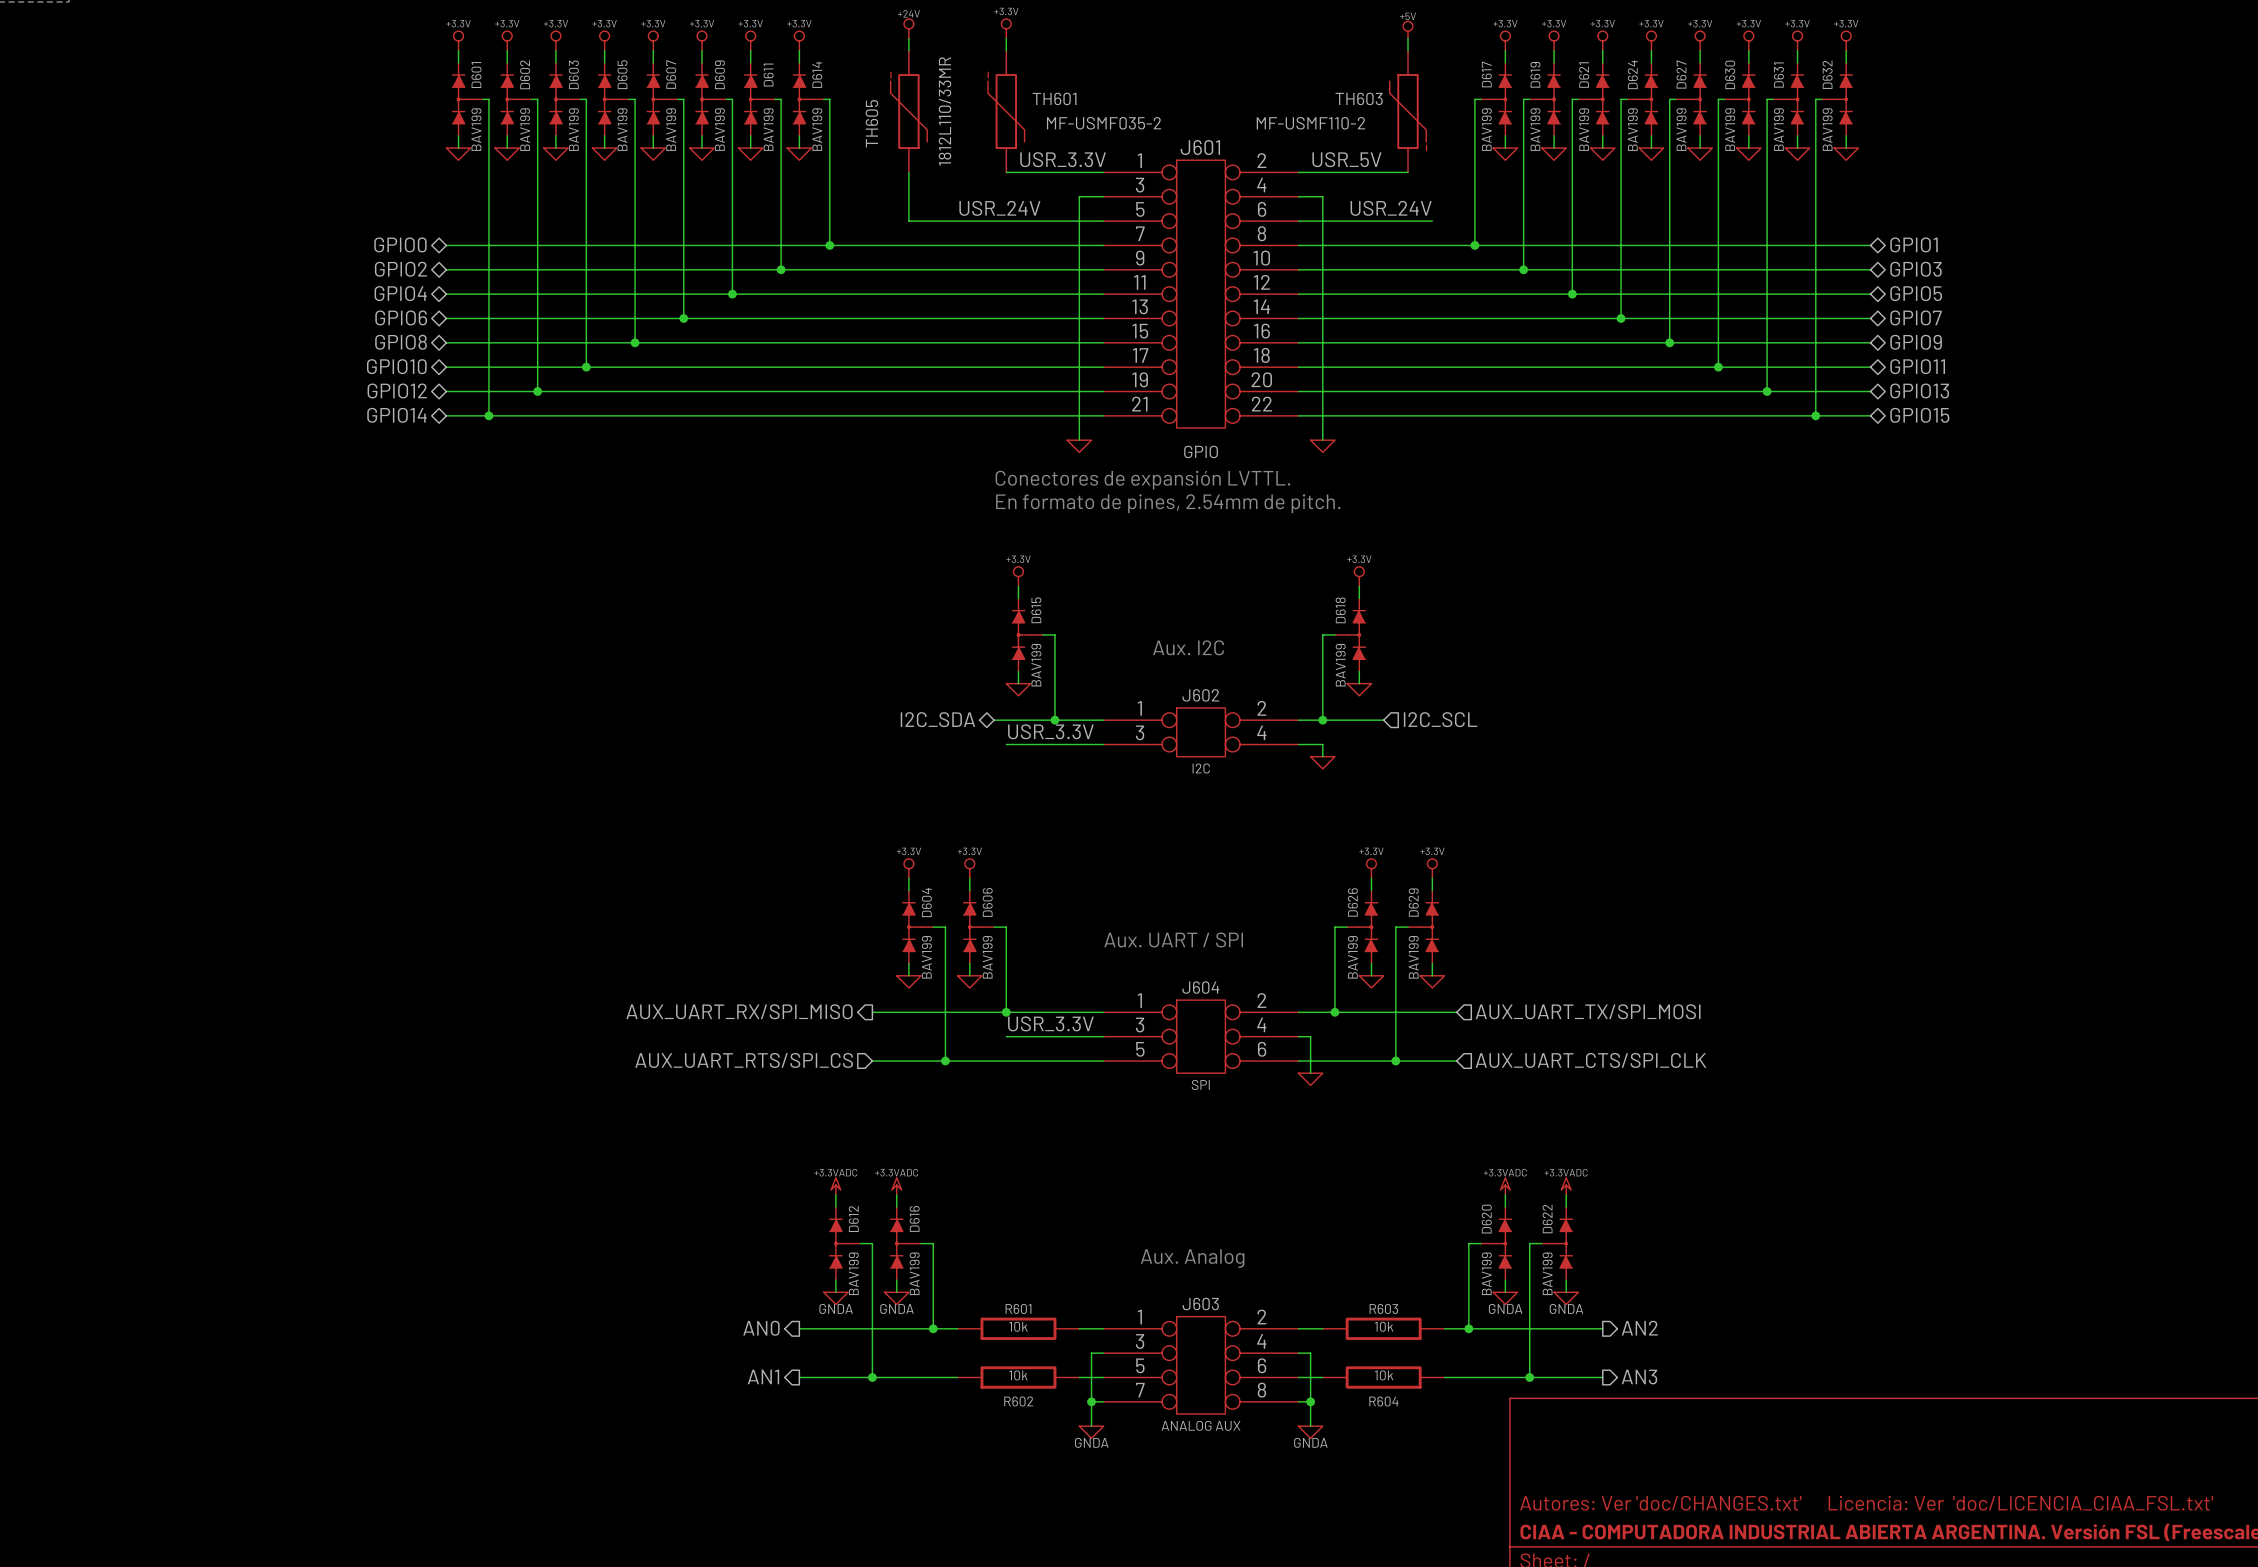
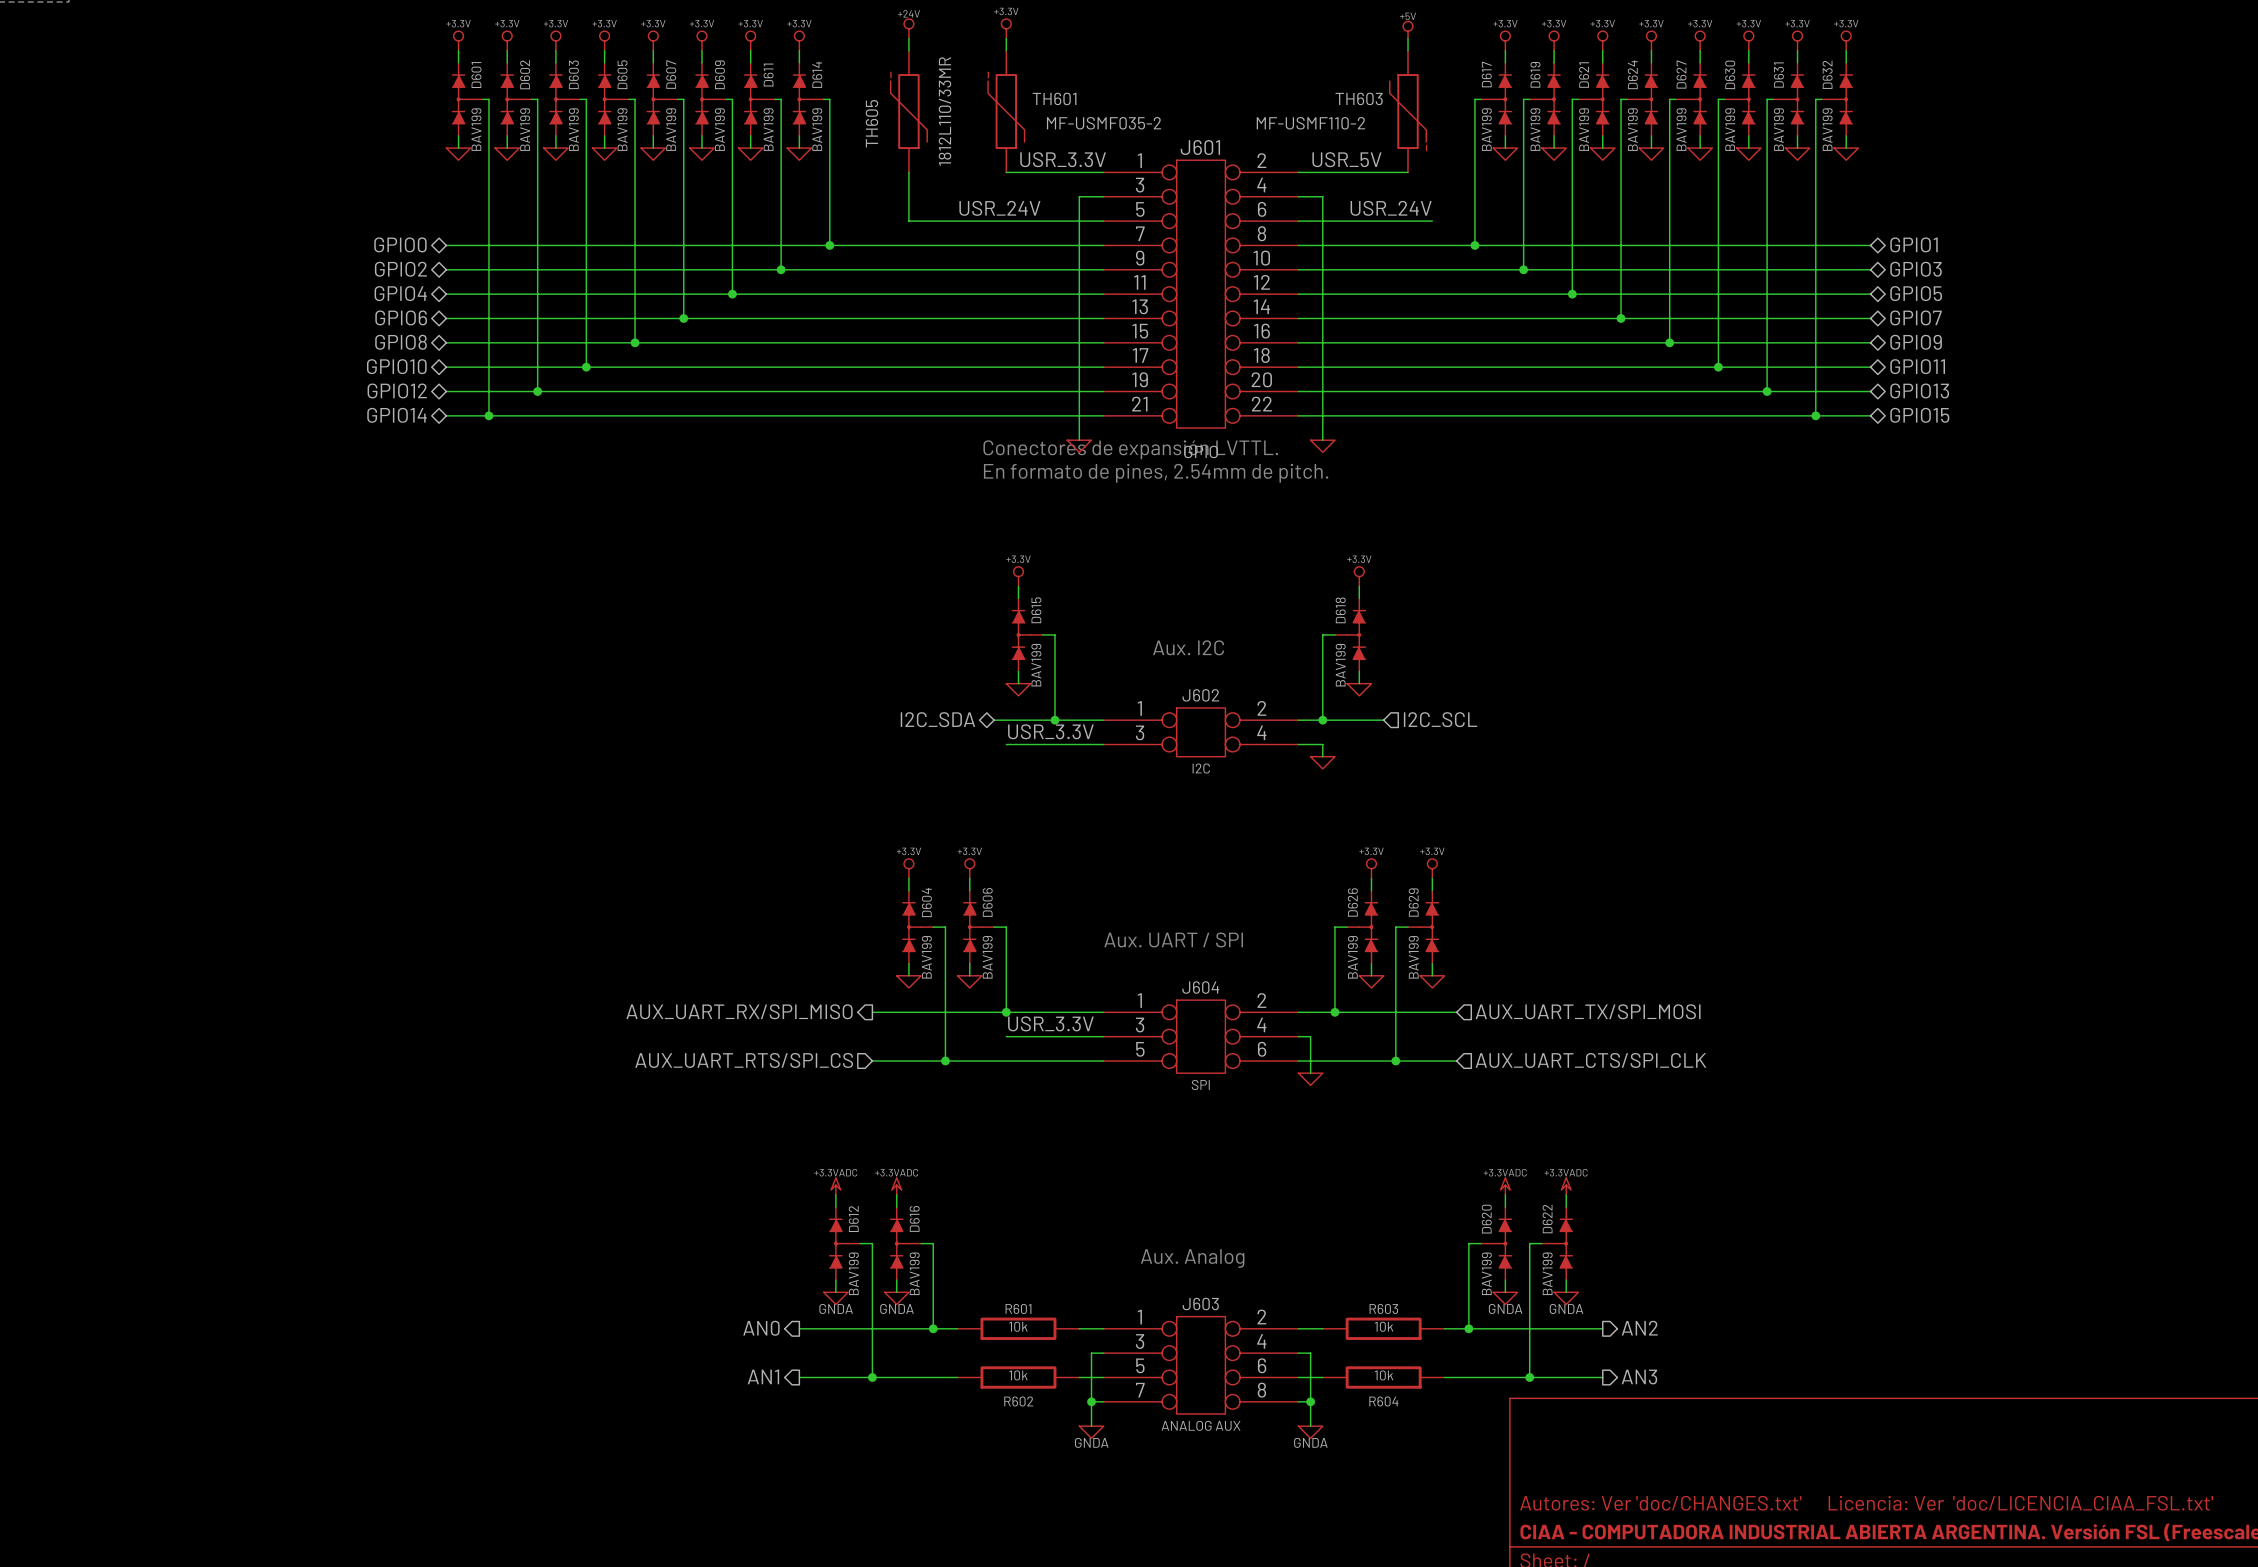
text position: Conectores de expansión LVTTL. (1142, 480) -> Conectores de expansión LVTTL. (1130, 449)
text position: En formato de pines, 2.54mm de pitch. (1168, 503) -> En formato de pines, 2.54mm de pitch. (1156, 473)

